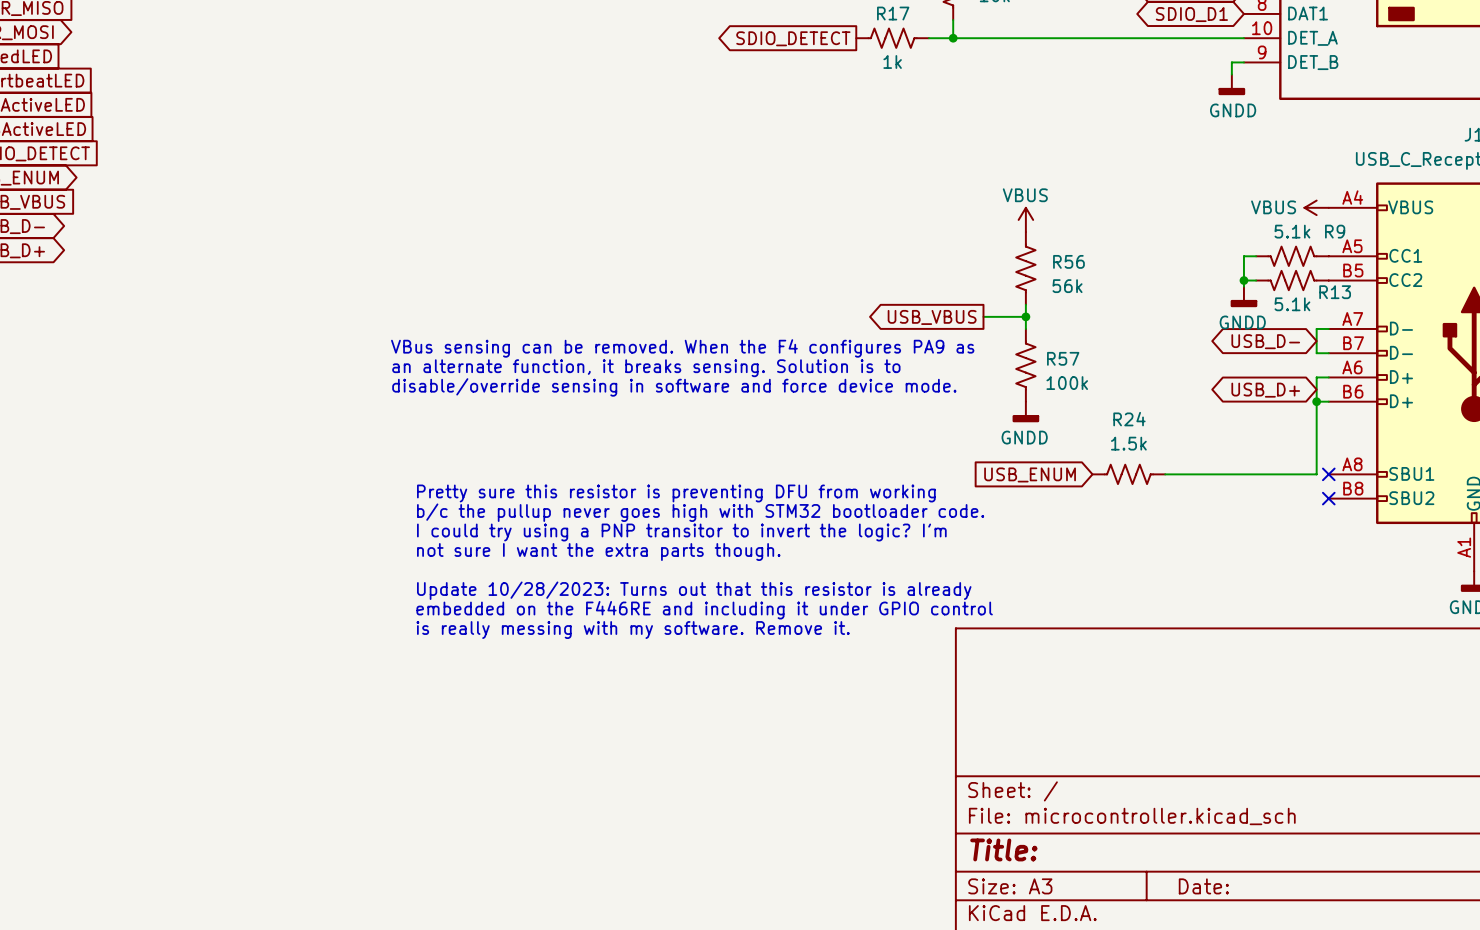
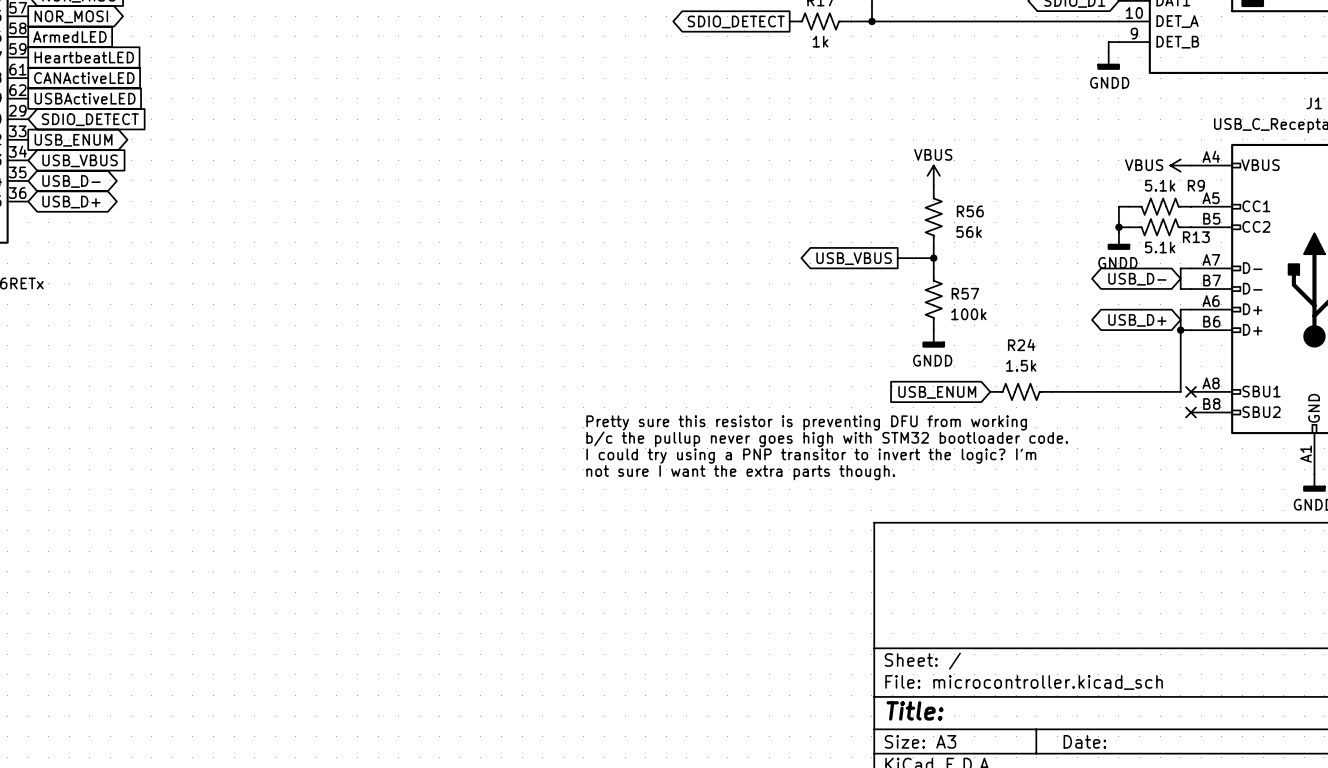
text: VBus sensing can be removed. When the F4 configures PA9 as (682, 348) -> none
text: an alternate function, it breaks sensing. Solution is to (646, 368) -> none
text: disable/override sensing in software and force device mode. (674, 387) -> none
text position: Pretty sure this resistor is preventing DFU from working (676, 493) -> Pretty sure this resistor is preventing DFU from working (806, 422)
text position: b/c the pullup never goes high with STM32 bootloader code. (700, 512) -> b/c the pullup never goes high with STM32 bootloader code. (827, 439)
text position: I could try using a PNP transitor to invert the logic? I'm (681, 532) -> I could try using a PNP transitor to invert the logic? I'm (811, 456)
text position: not sure I want the extra parts though. (598, 552) -> not sure I want the extra parts though. (740, 472)
text: Update 10/28/2023: Turns out that this resistor is already (694, 590) -> none
text: embedded on the F446RE and including it under GPIO control (704, 610) -> none
text: is really messing with my software. Remove it. (633, 630) -> none

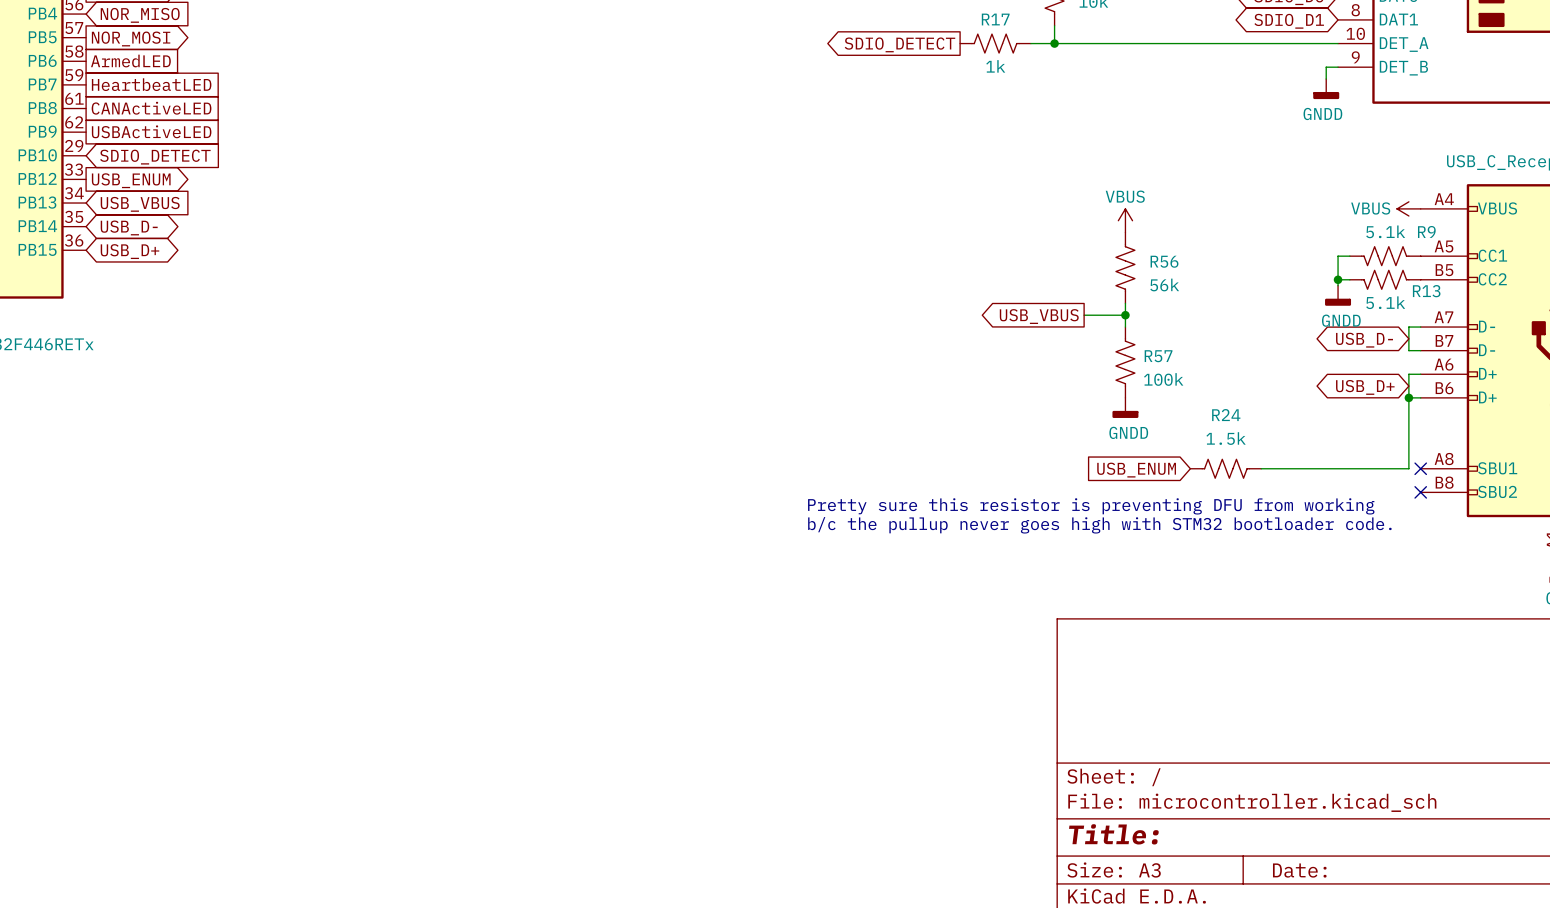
text position: Pretty sure this resistor is preventing DFU from working (806, 422) -> Pretty sure this resistor is preventing DFU from working (1091, 506)
text position: b/c the pullup never goes high with STM32 bootloader code. (827, 439) -> b/c the pullup never goes high with STM32 bootloader code. (1099, 525)
text: I could try using a PNP transitor to invert the logic? I'm (811, 456) -> none
text: not sure I want the extra parts though. (740, 472) -> none

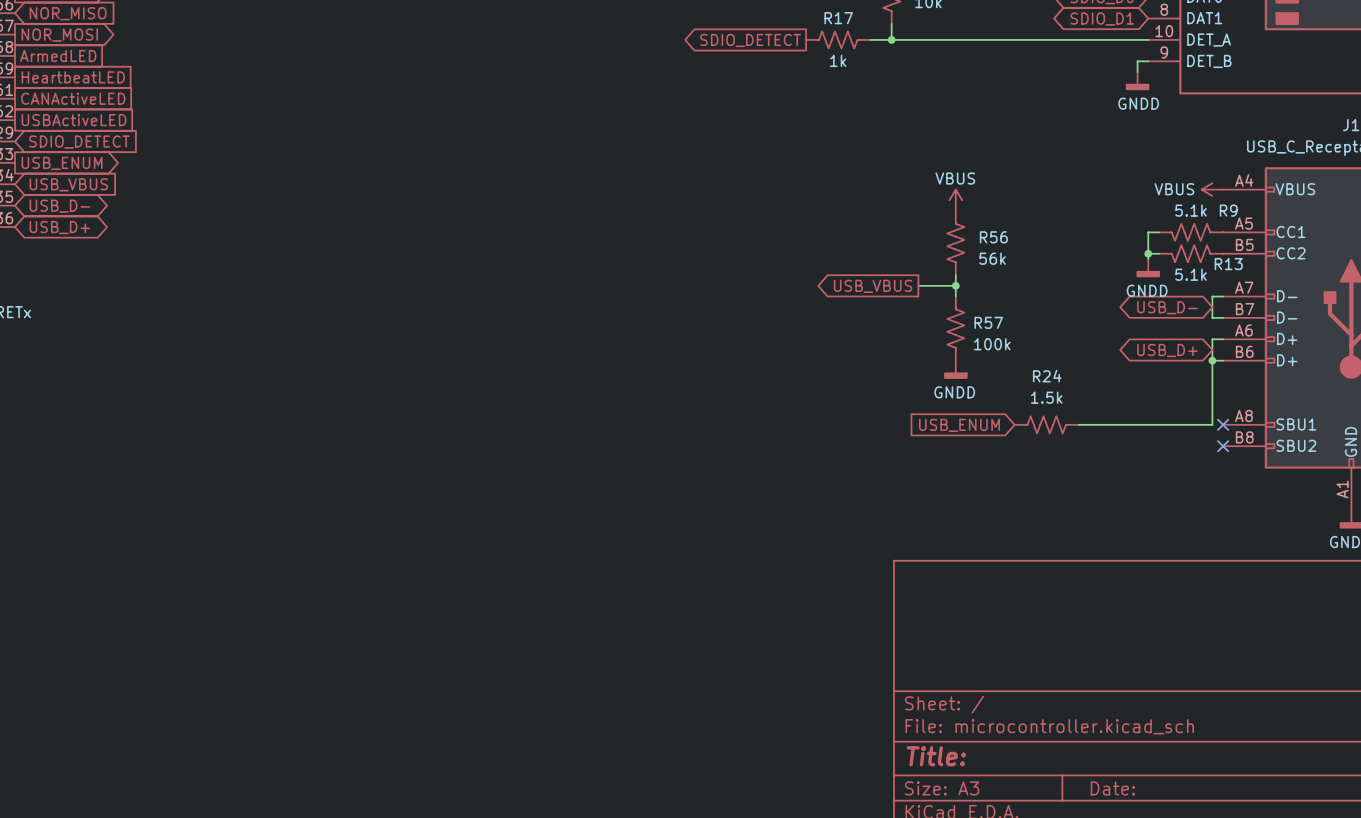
text: Pretty sure this resistor is preventing DFU from working (1091, 506) -> none
text: b/c the pullup never goes high with STM32 bootloader code. (1099, 525) -> none

